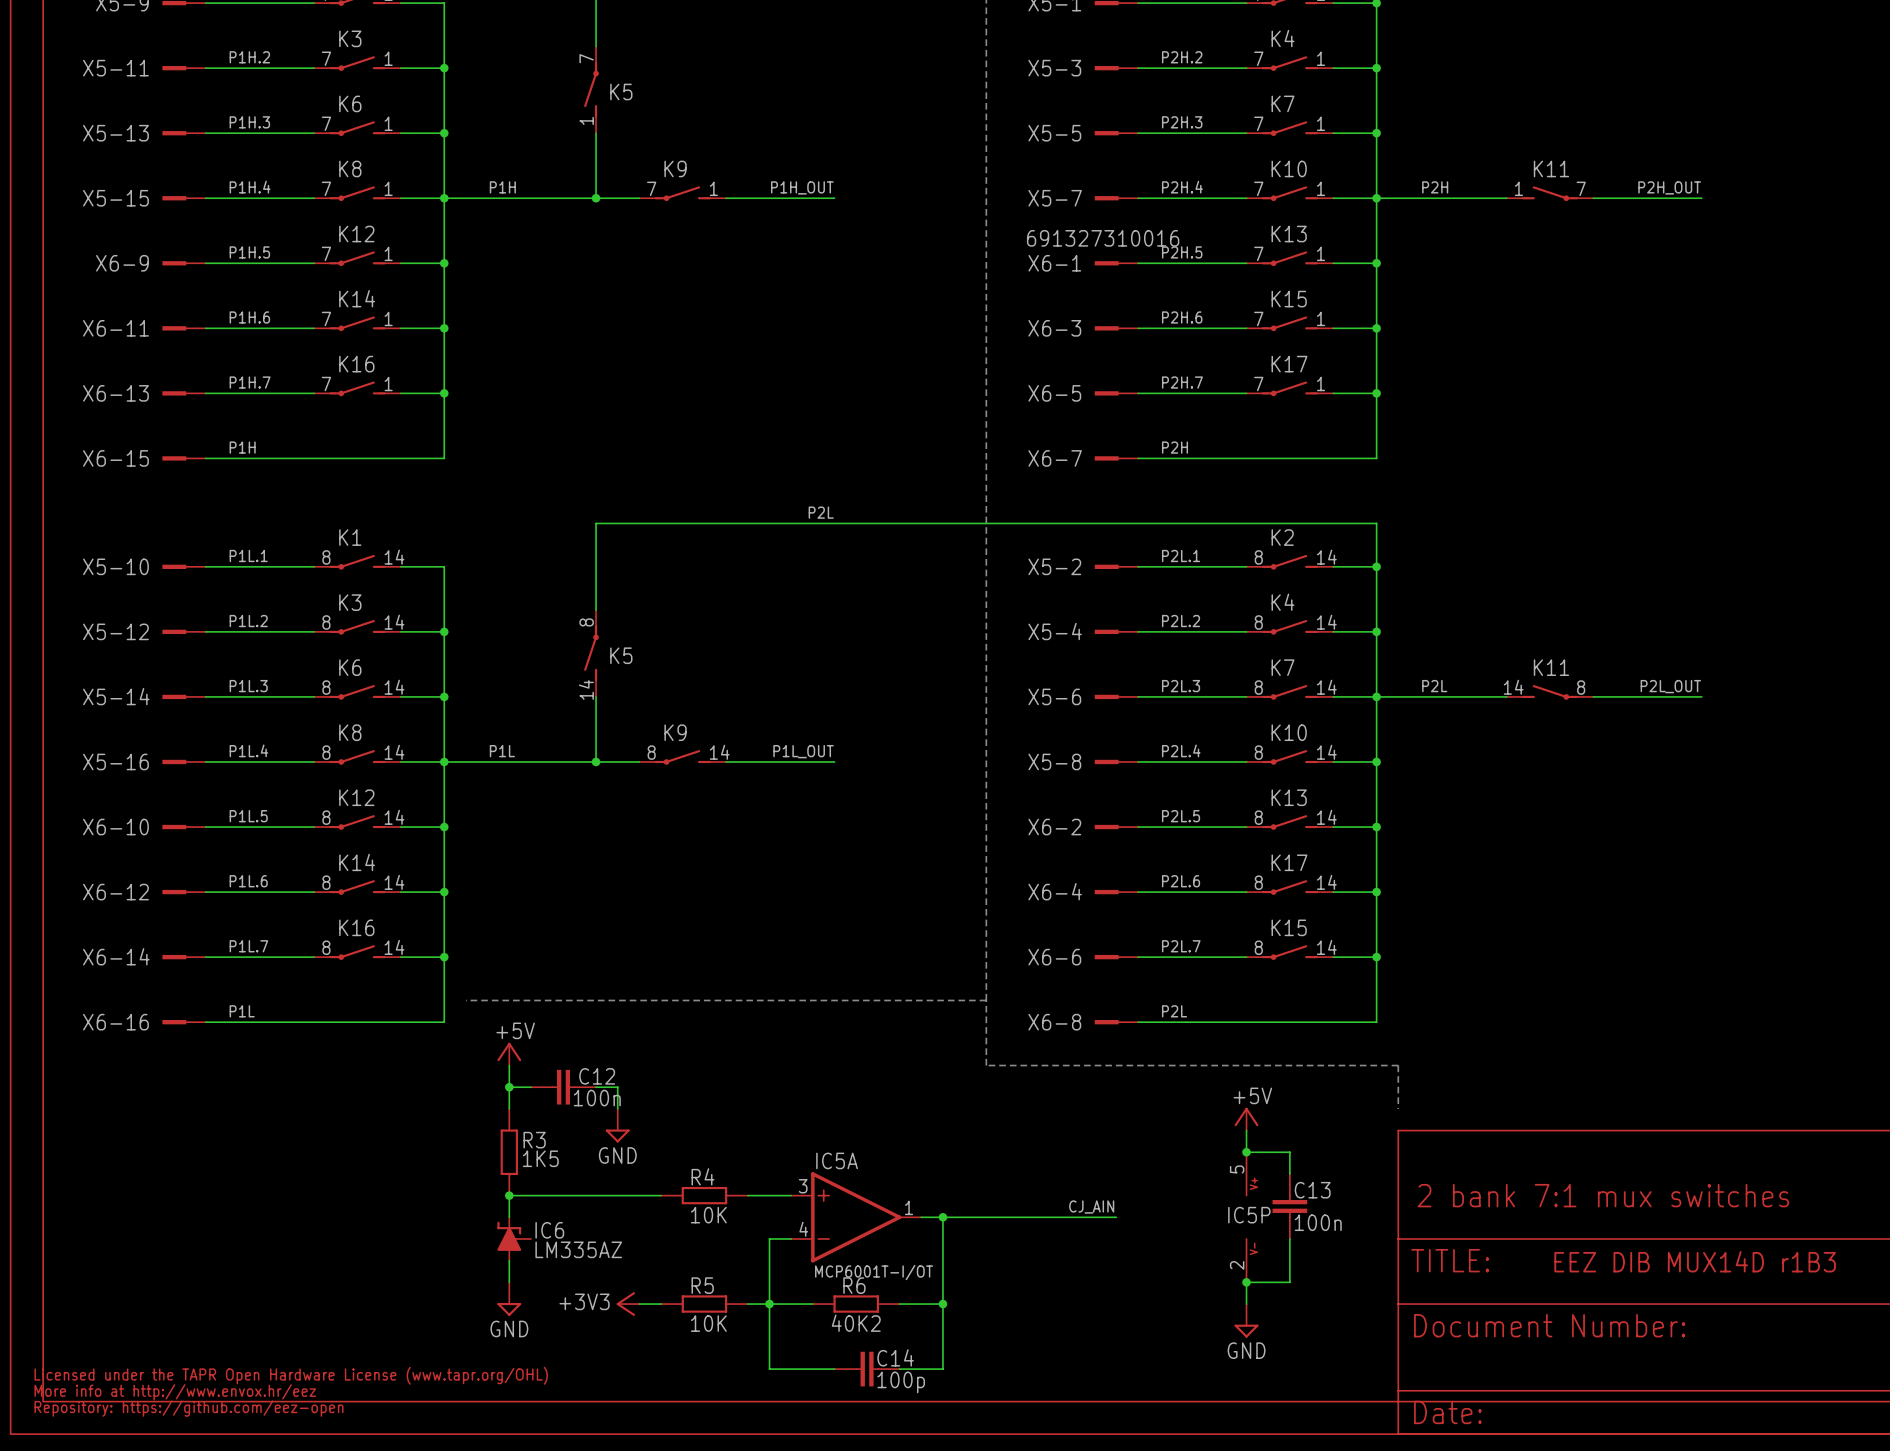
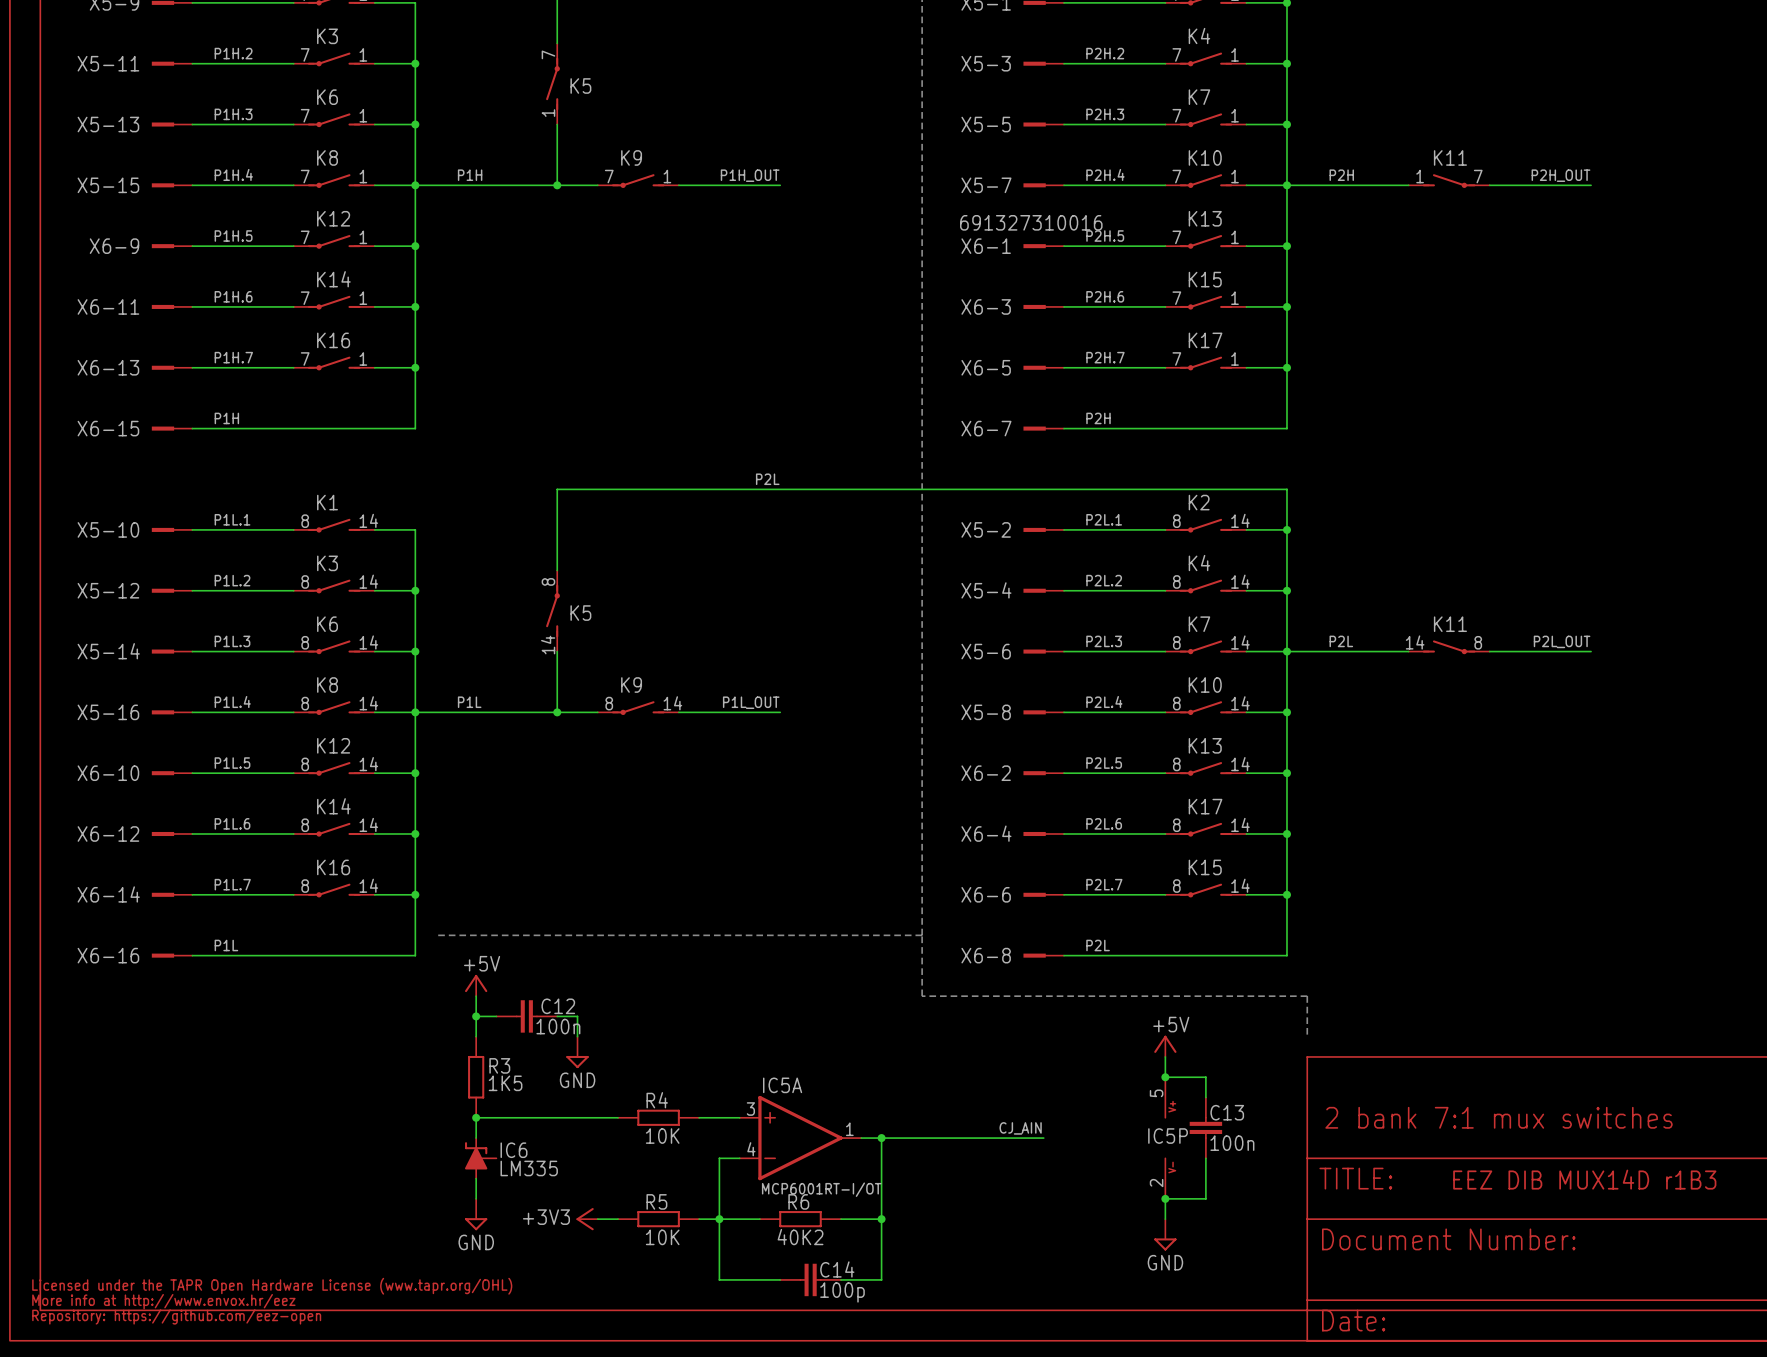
IC6 value: LM335AZ (578, 1249) -> LM335 (529, 1168)
IC5A value: MCP6001T-I/OT (874, 1272) -> MCP6001RT-I/OT (821, 1189)

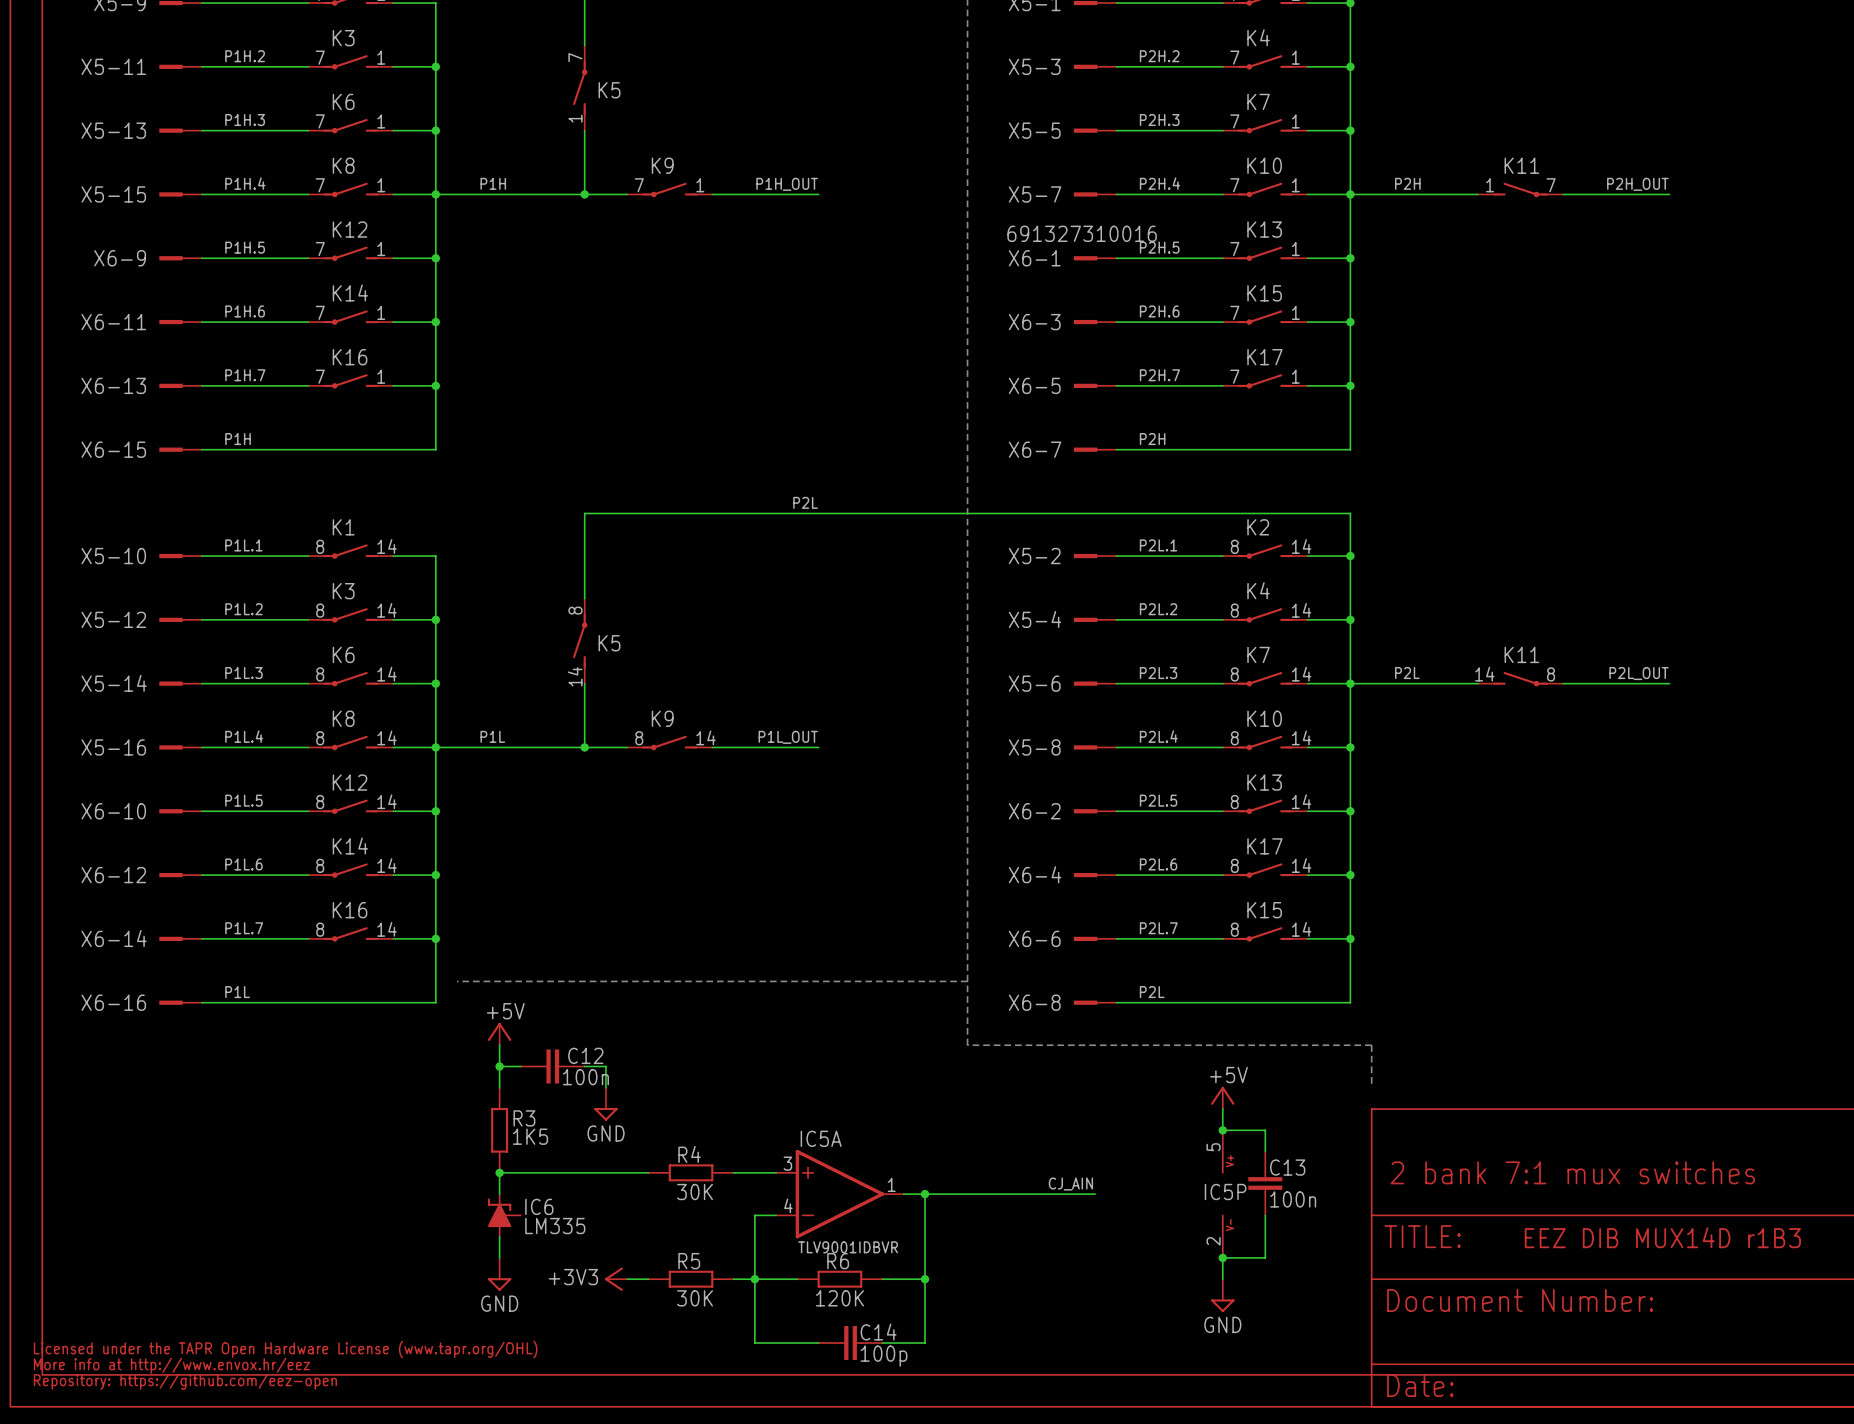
R4 value: 10K (662, 1136) -> 30K (695, 1192)
IC5A value: MCP6001RT-I/OT (821, 1189) -> TLV9001IDBVR (848, 1247)
R5 value: 10K (662, 1237) -> 30K (695, 1298)
R6 value: 40K2 (800, 1237) -> 120K (839, 1298)

